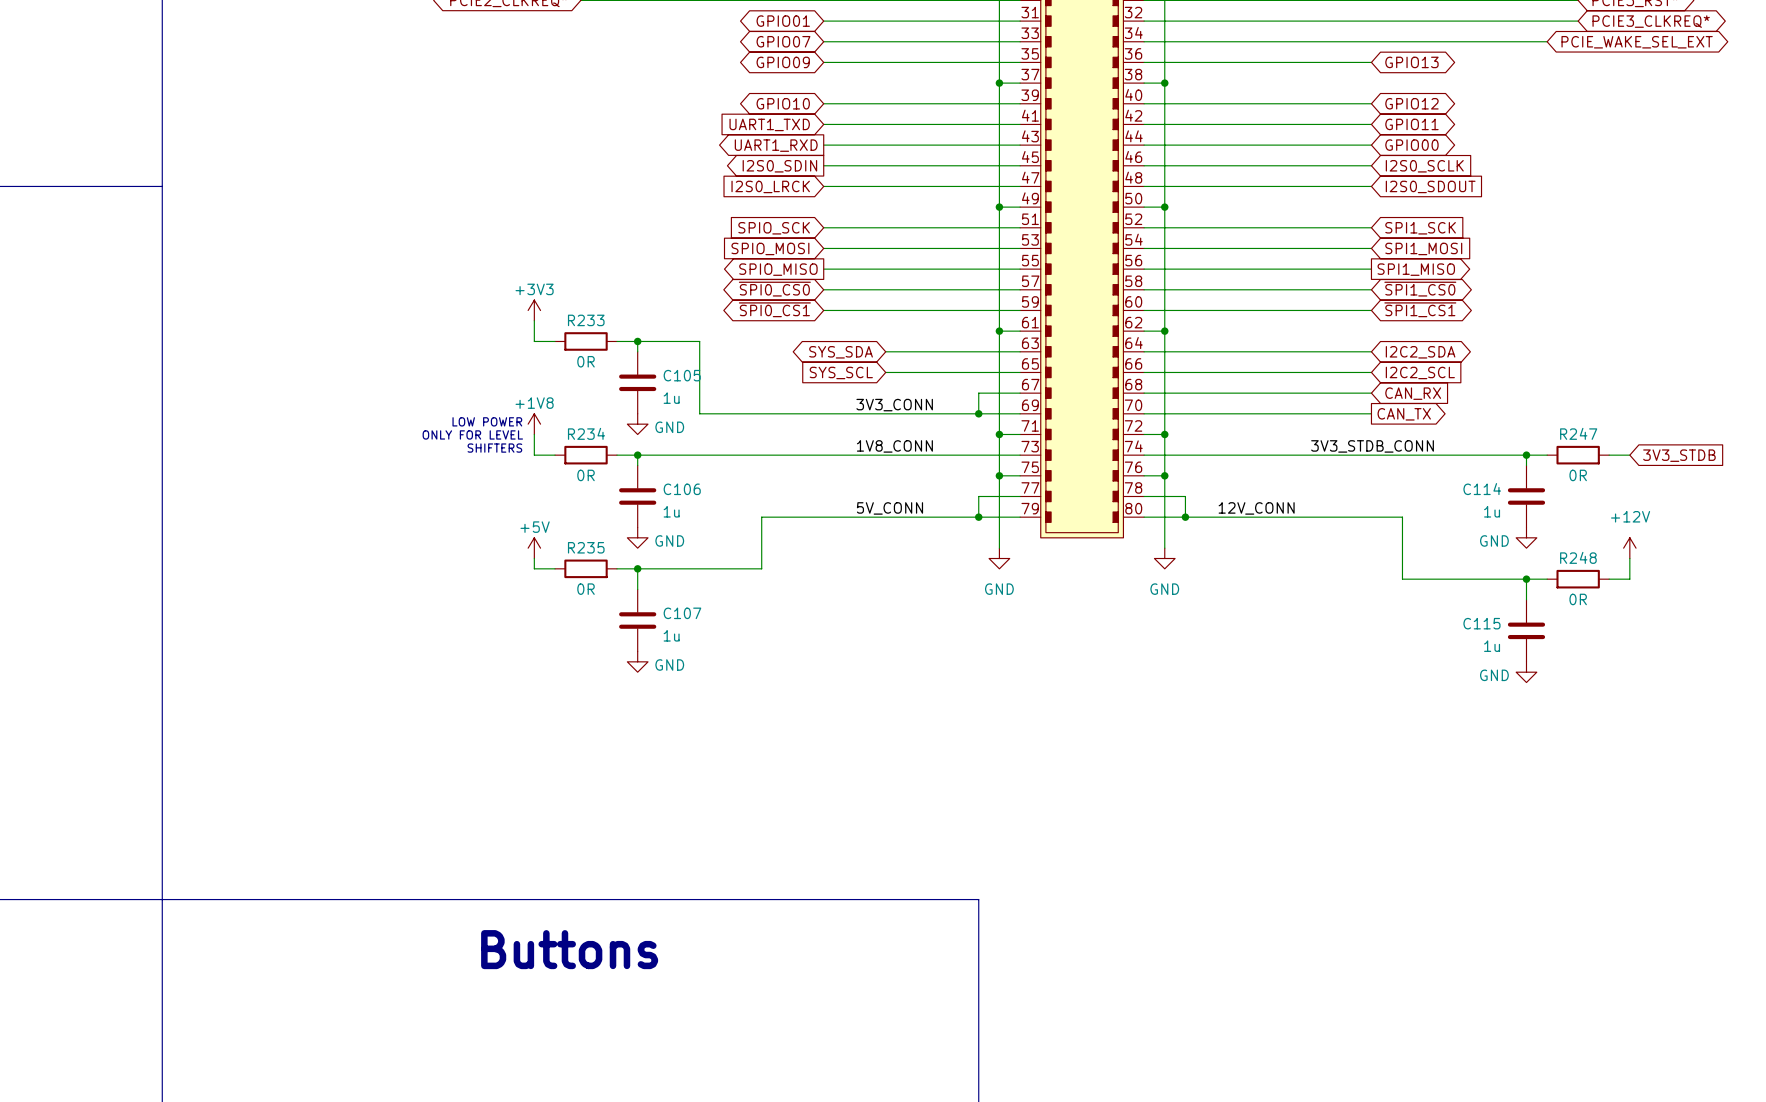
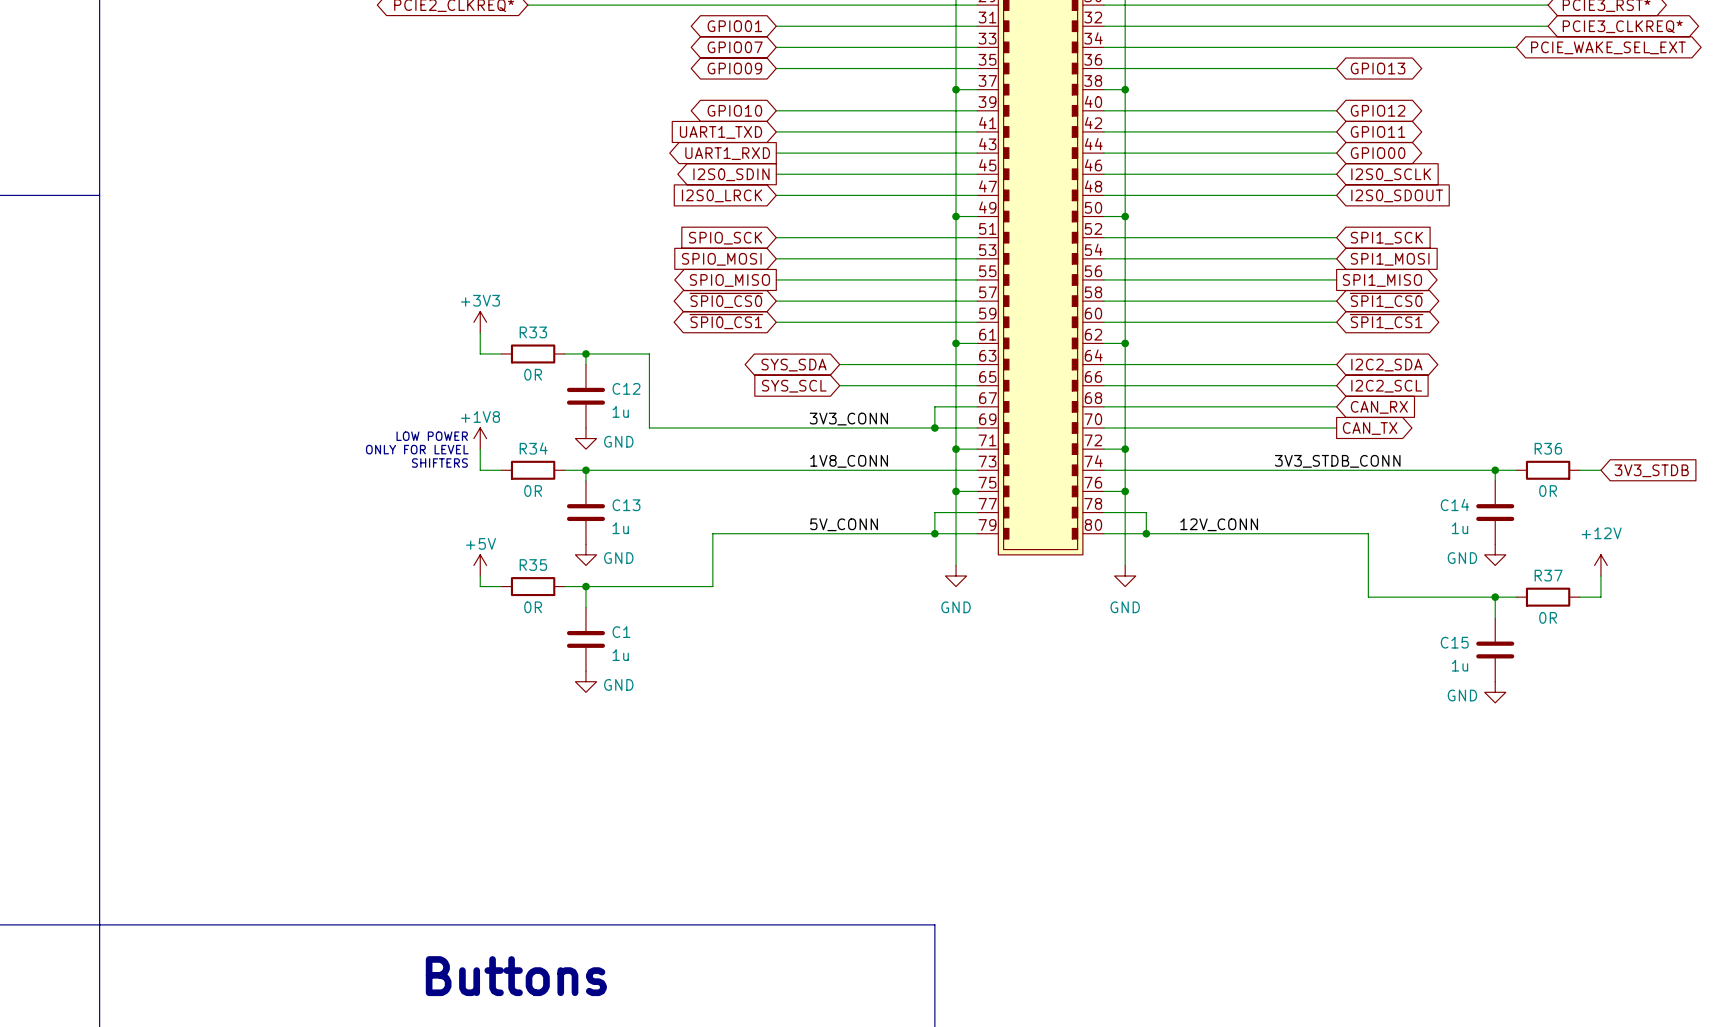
R233 name: R233 (586, 320) -> R33 (533, 332)
C105 name: C105 (682, 375) -> C12 (626, 388)
R234 name: R234 (586, 433) -> R34 (533, 448)
R247 name: R247 (1578, 433) -> R36 (1548, 448)
C106 name: C106 (682, 489) -> C13 (626, 505)
C114 name: C114 (1482, 489) -> C14 (1454, 504)
R235 name: R235 (586, 547) -> R35 (533, 565)
R248 name: R248 (1578, 557) -> R37 (1548, 575)
C107 name: C107 (682, 613) -> C1 (621, 632)
C115 name: C115 (1481, 623) -> C15 (1454, 642)

